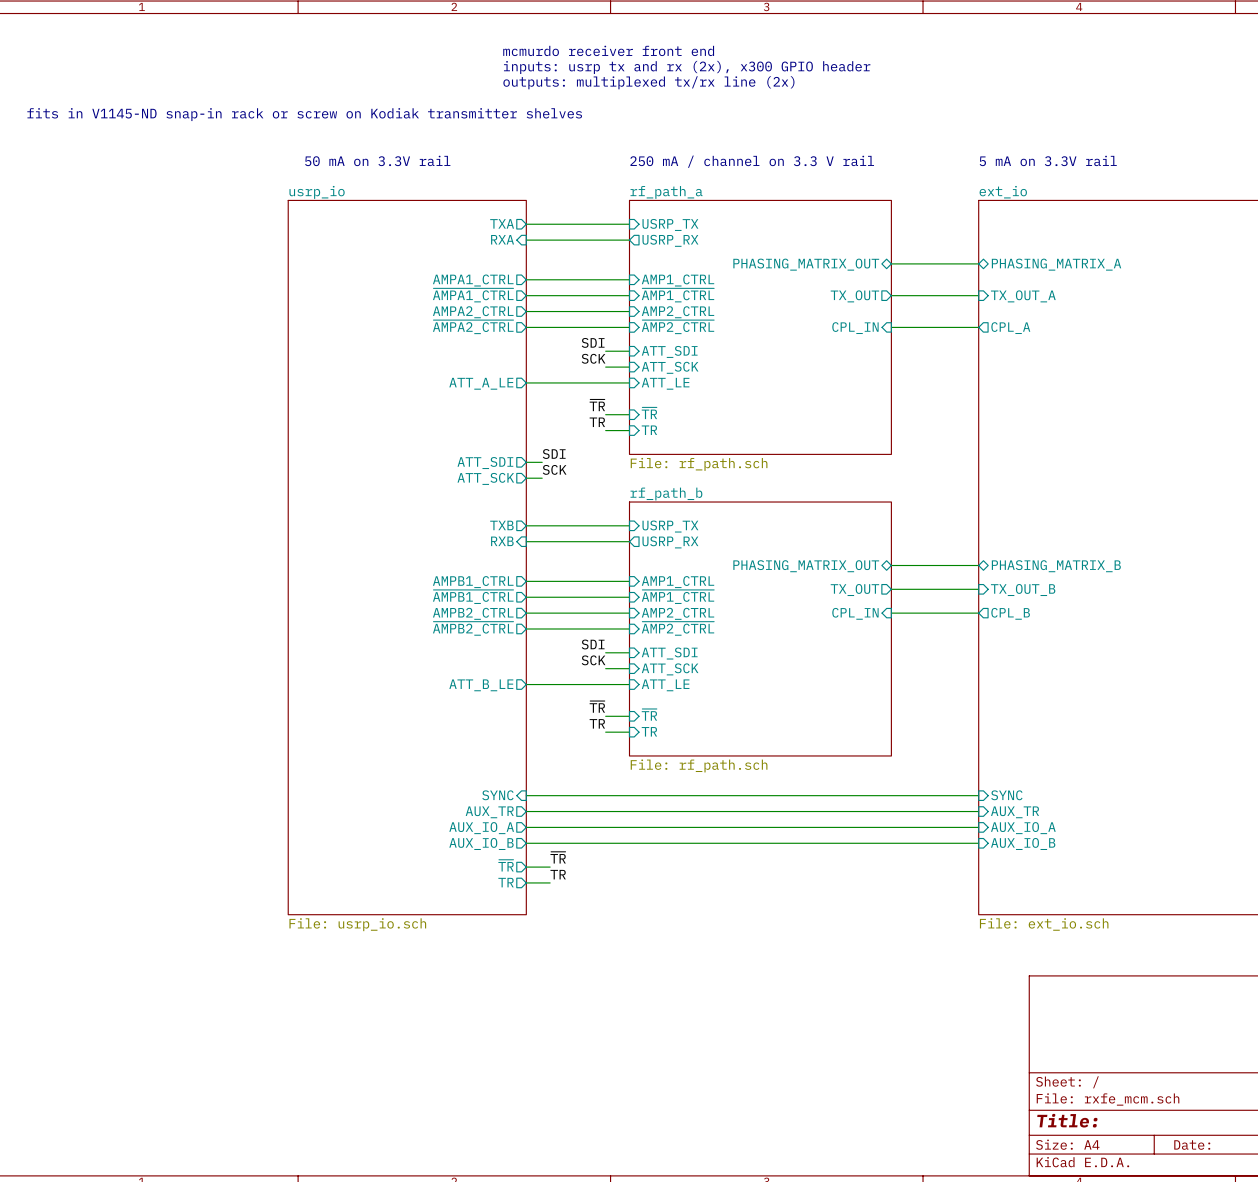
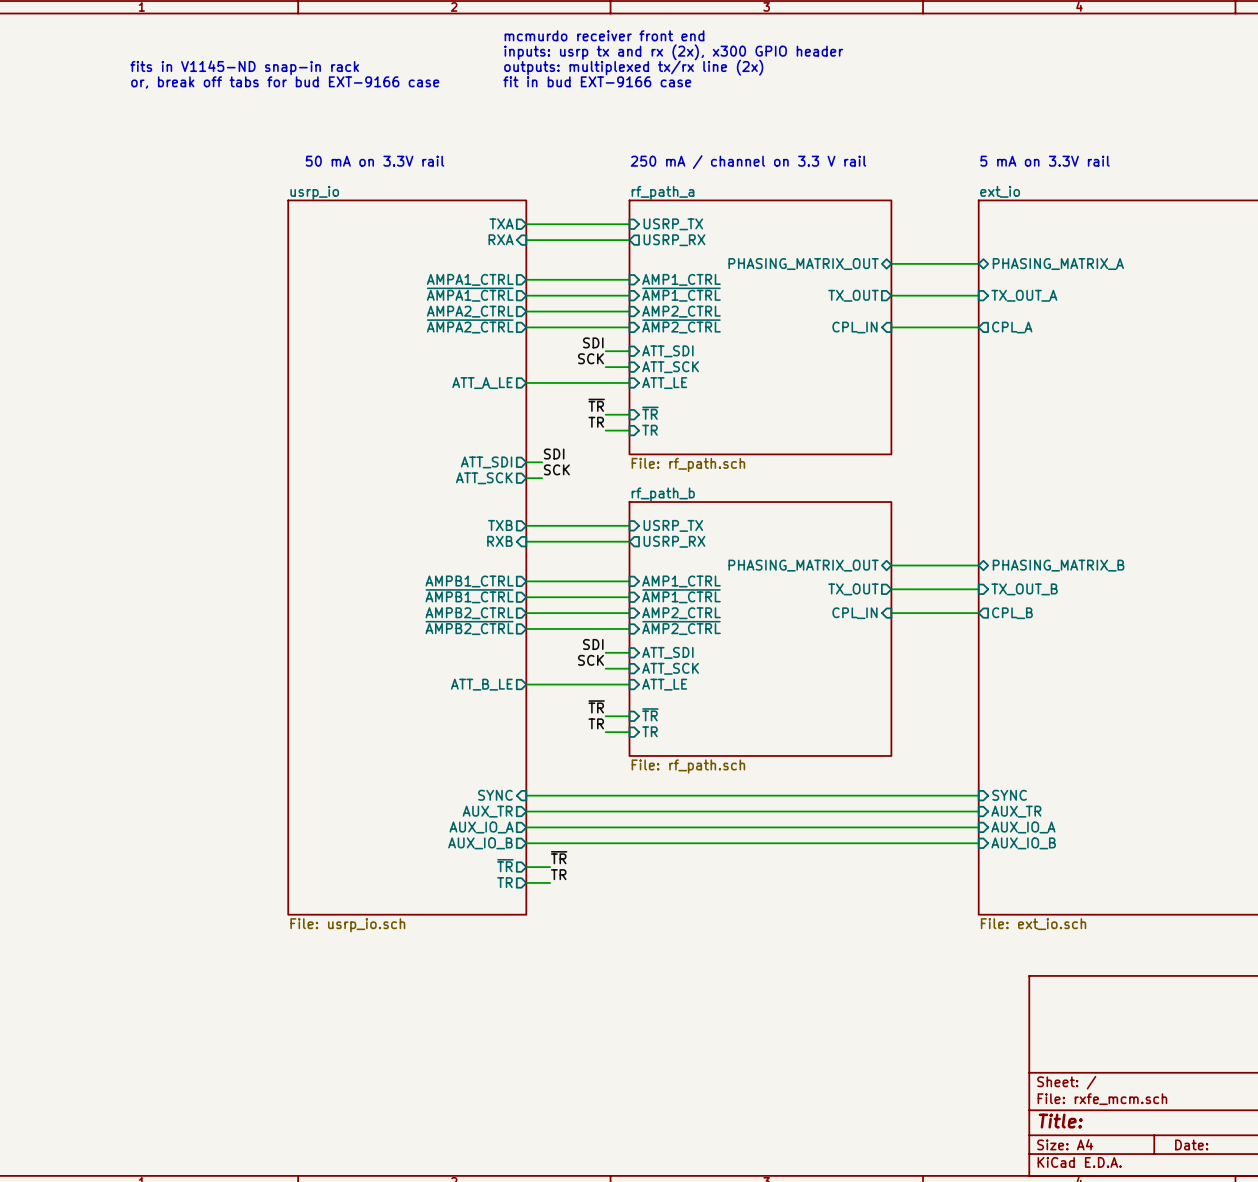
text: none -> mcmurdo receiver front end (604, 35)
text: mcmurdo receiver front end (608, 50) -> inputs: usrp tx and rx (2x), x300 GPIO header (673, 52)
text: none -> fits in V1145-ND snap-in rack (244, 67)
text: inputs: usrp tx and rx (2x), x300 GPIO header (687, 67) -> outputs: multiplexed tx/rx line (2x) (633, 67)
text: none -> or, break off tabs for bud EXT-9166 case (285, 82)
text: outputs: multiplexed tx/rx line (2x) (648, 82) -> fit in bud EXT-9166 case (597, 81)
text: fits in V1145-ND snap-in rack or screw on Kodiak transmitter shelves (304, 114) -> none

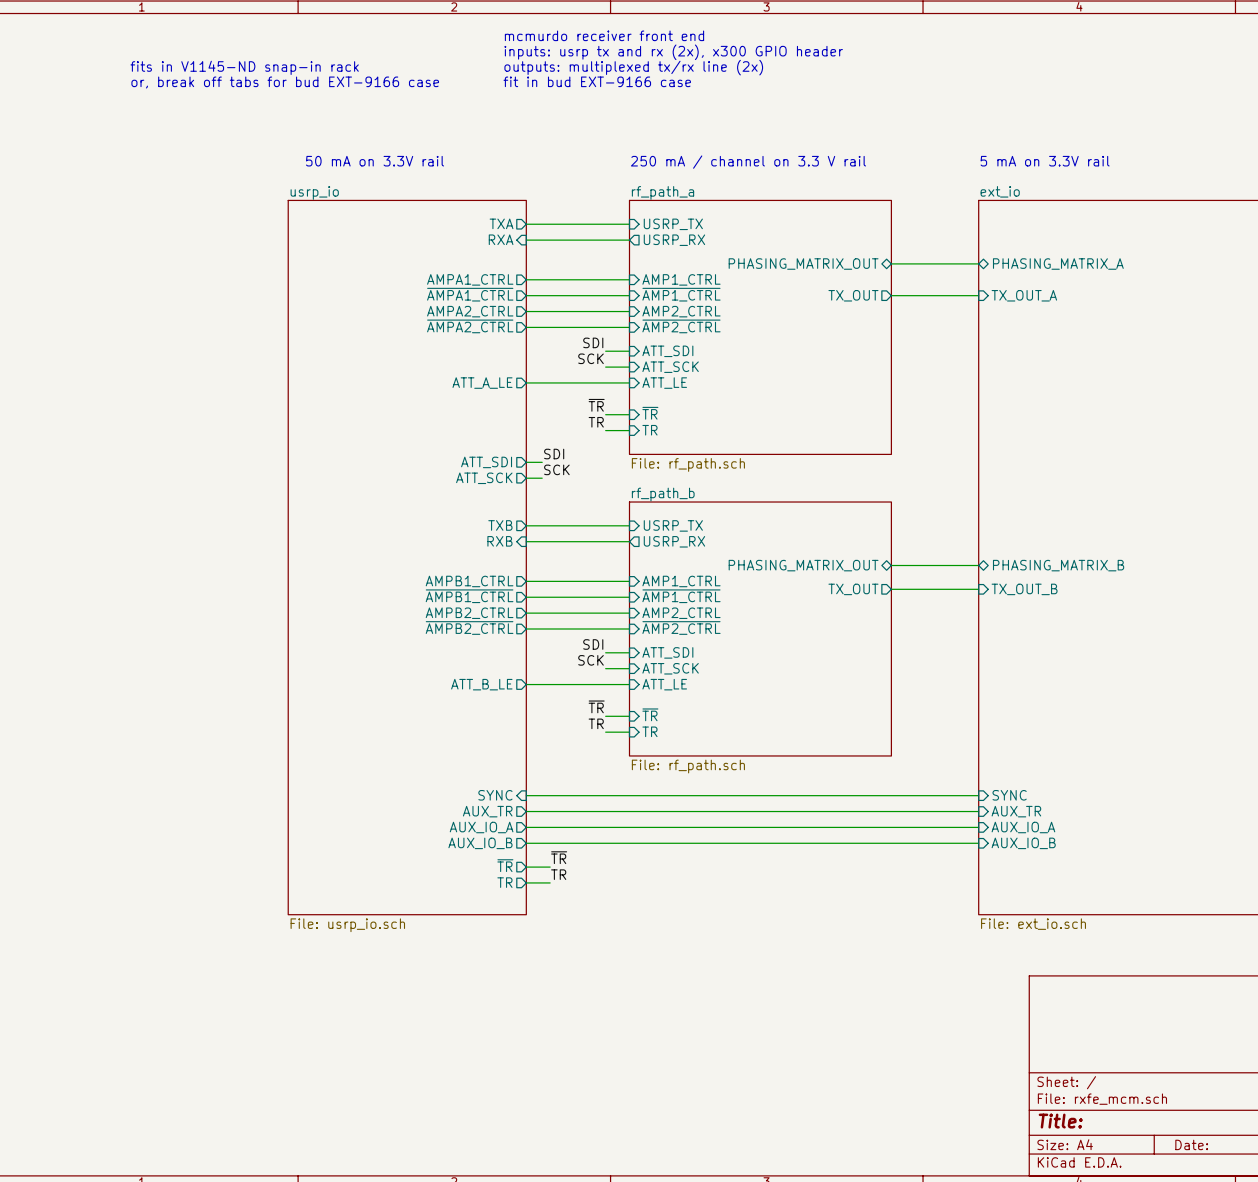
sheet pin: CPL_IN (854, 327) -> none
wire: (891, 327) (978, 327) -> none
sheet pin: CPL_A (1012, 327) -> none
sheet pin: CPL_IN (854, 613) -> none
wire: (891, 613) (978, 613) -> none
sheet pin: CPL_B (1012, 613) -> none

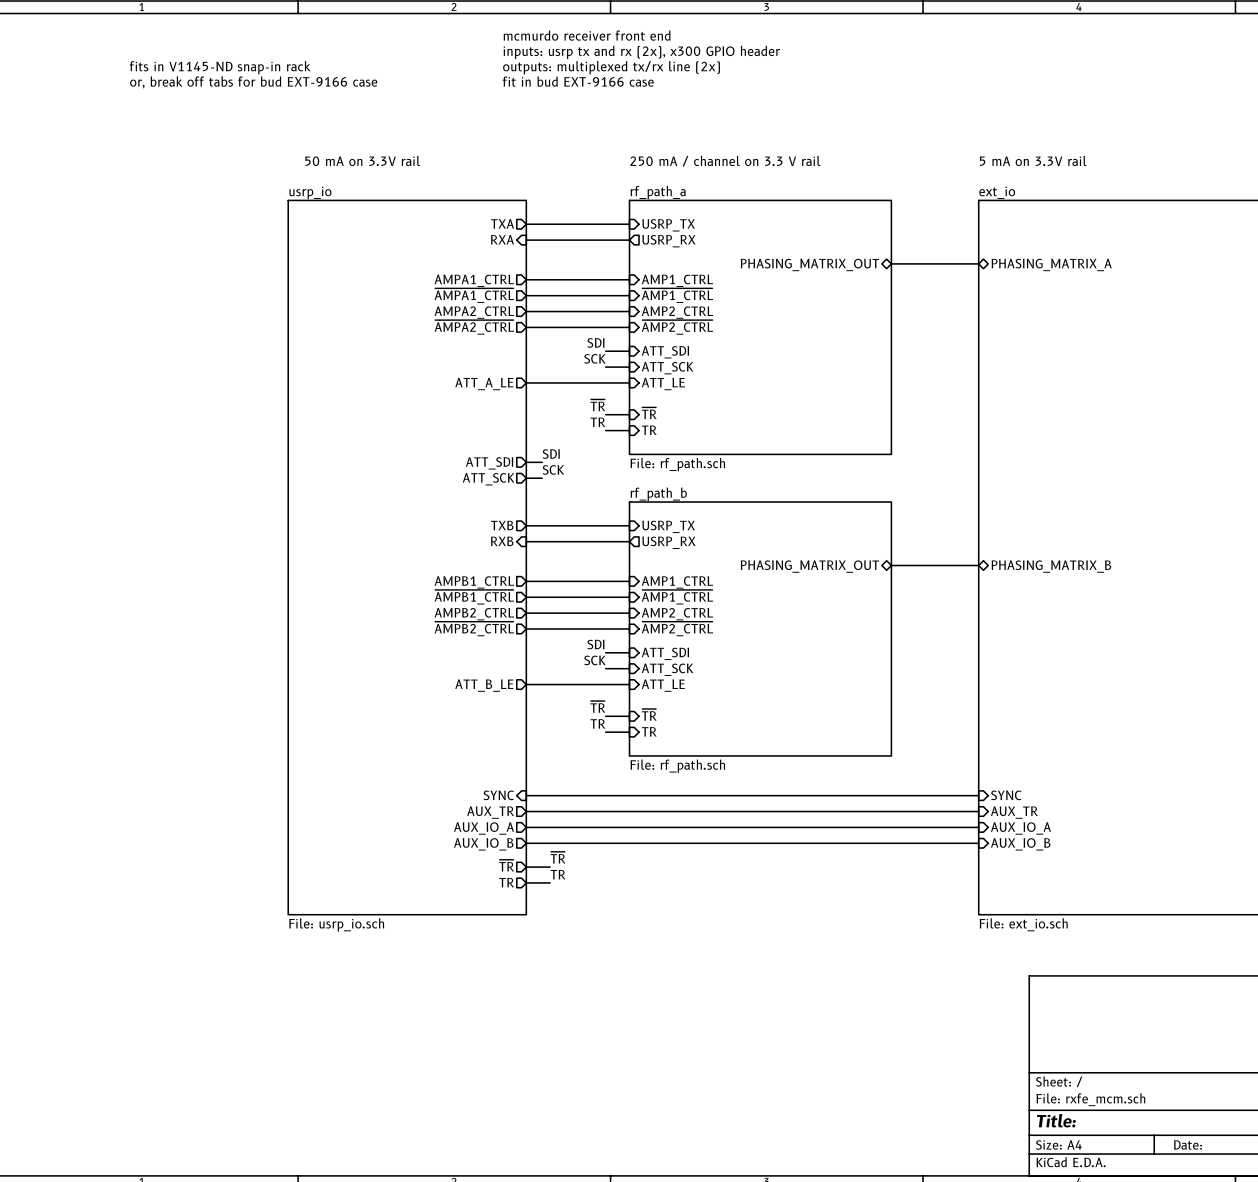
sheet pin: TX_OUT (853, 295) -> none
wire: (891, 295) (978, 295) -> none
sheet pin: TX_OUT_A (1024, 295) -> none
sheet pin: TX_OUT (853, 589) -> none
wire: (891, 589) (978, 589) -> none
sheet pin: TX_OUT_B (1024, 589) -> none

